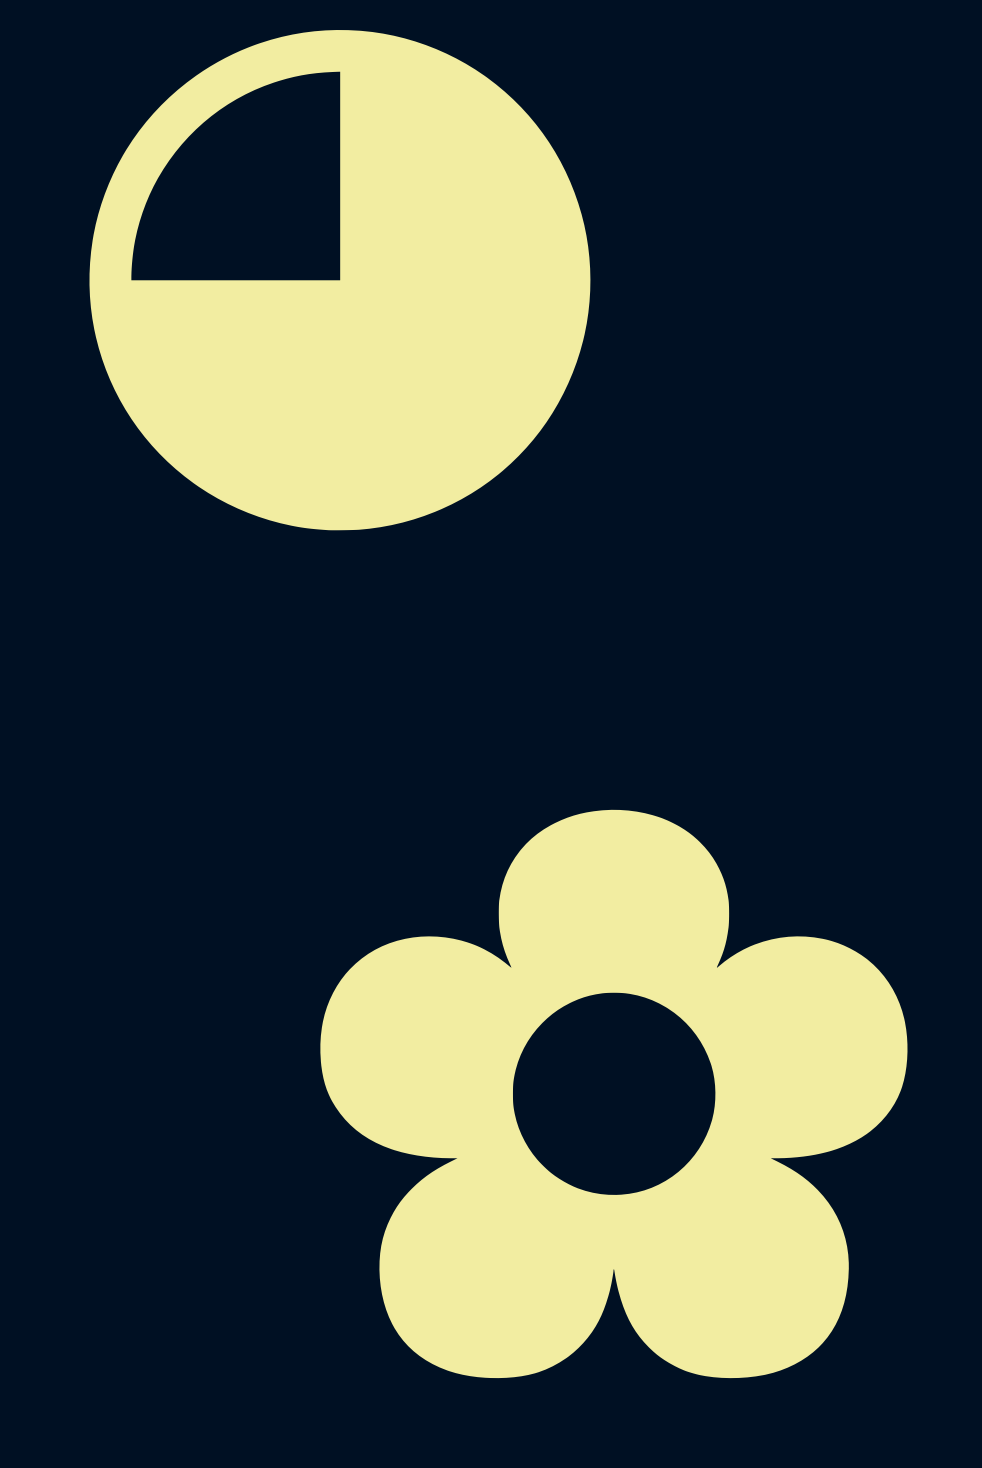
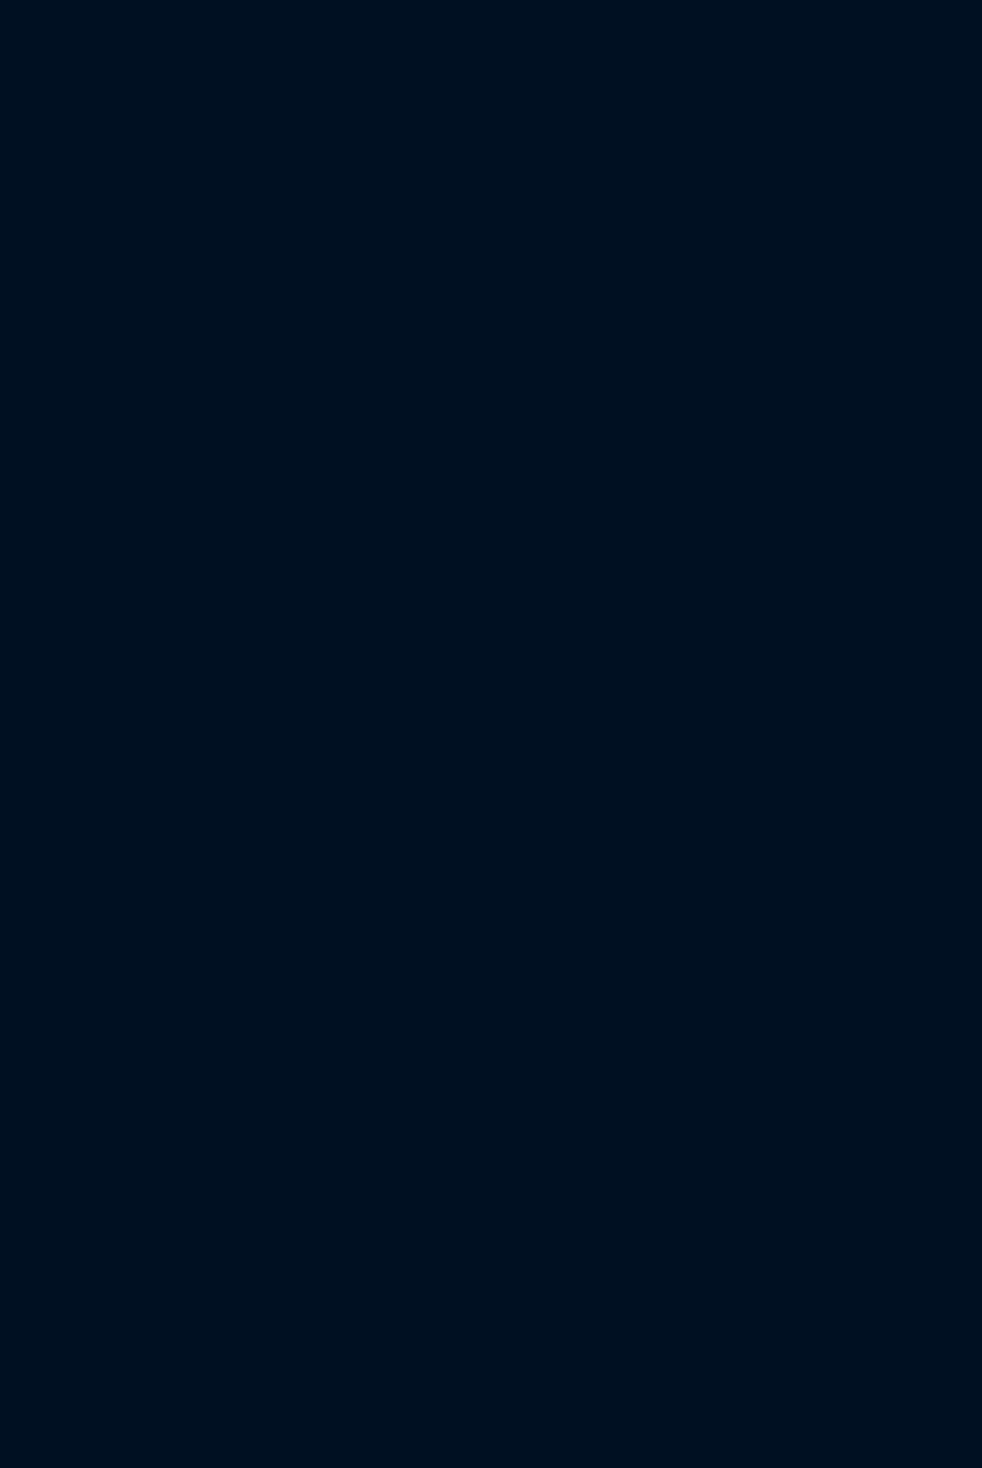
drawing: [89, 30, 591, 531] -> none
drawing: [320, 809, 908, 1379] -> none

